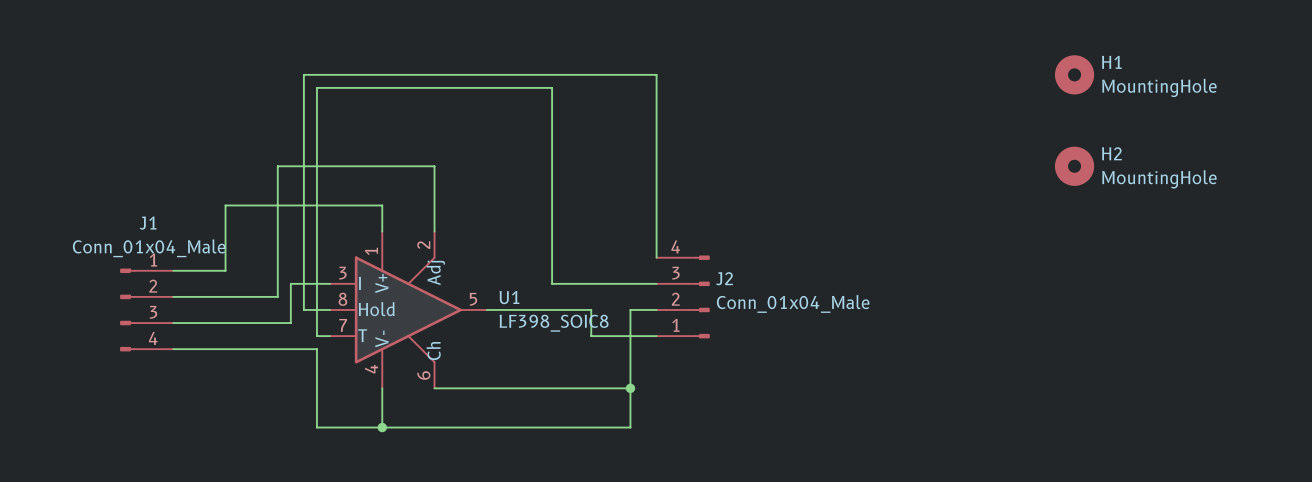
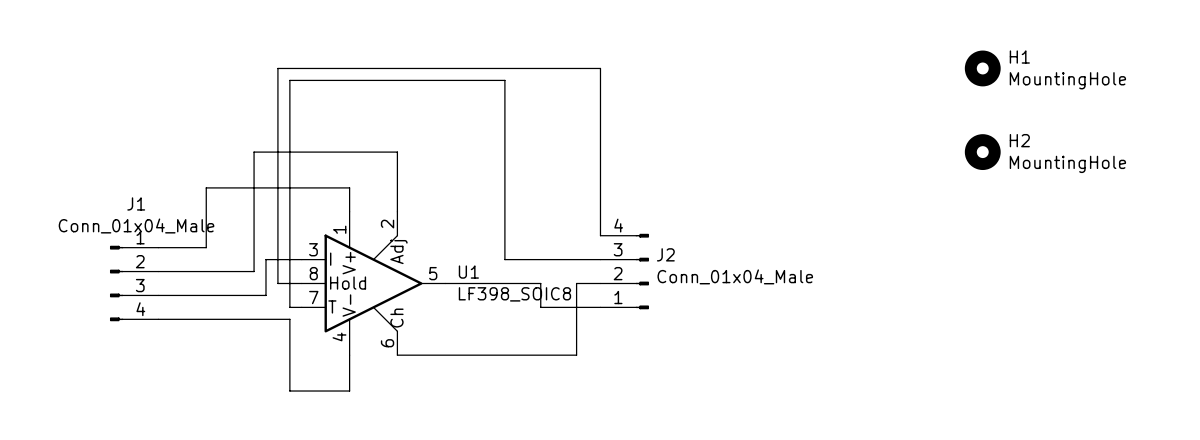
wire: (630, 388) (630, 427) (382, 427) -> none
junction: (630, 388) -> none
junction: (382, 427) -> none

